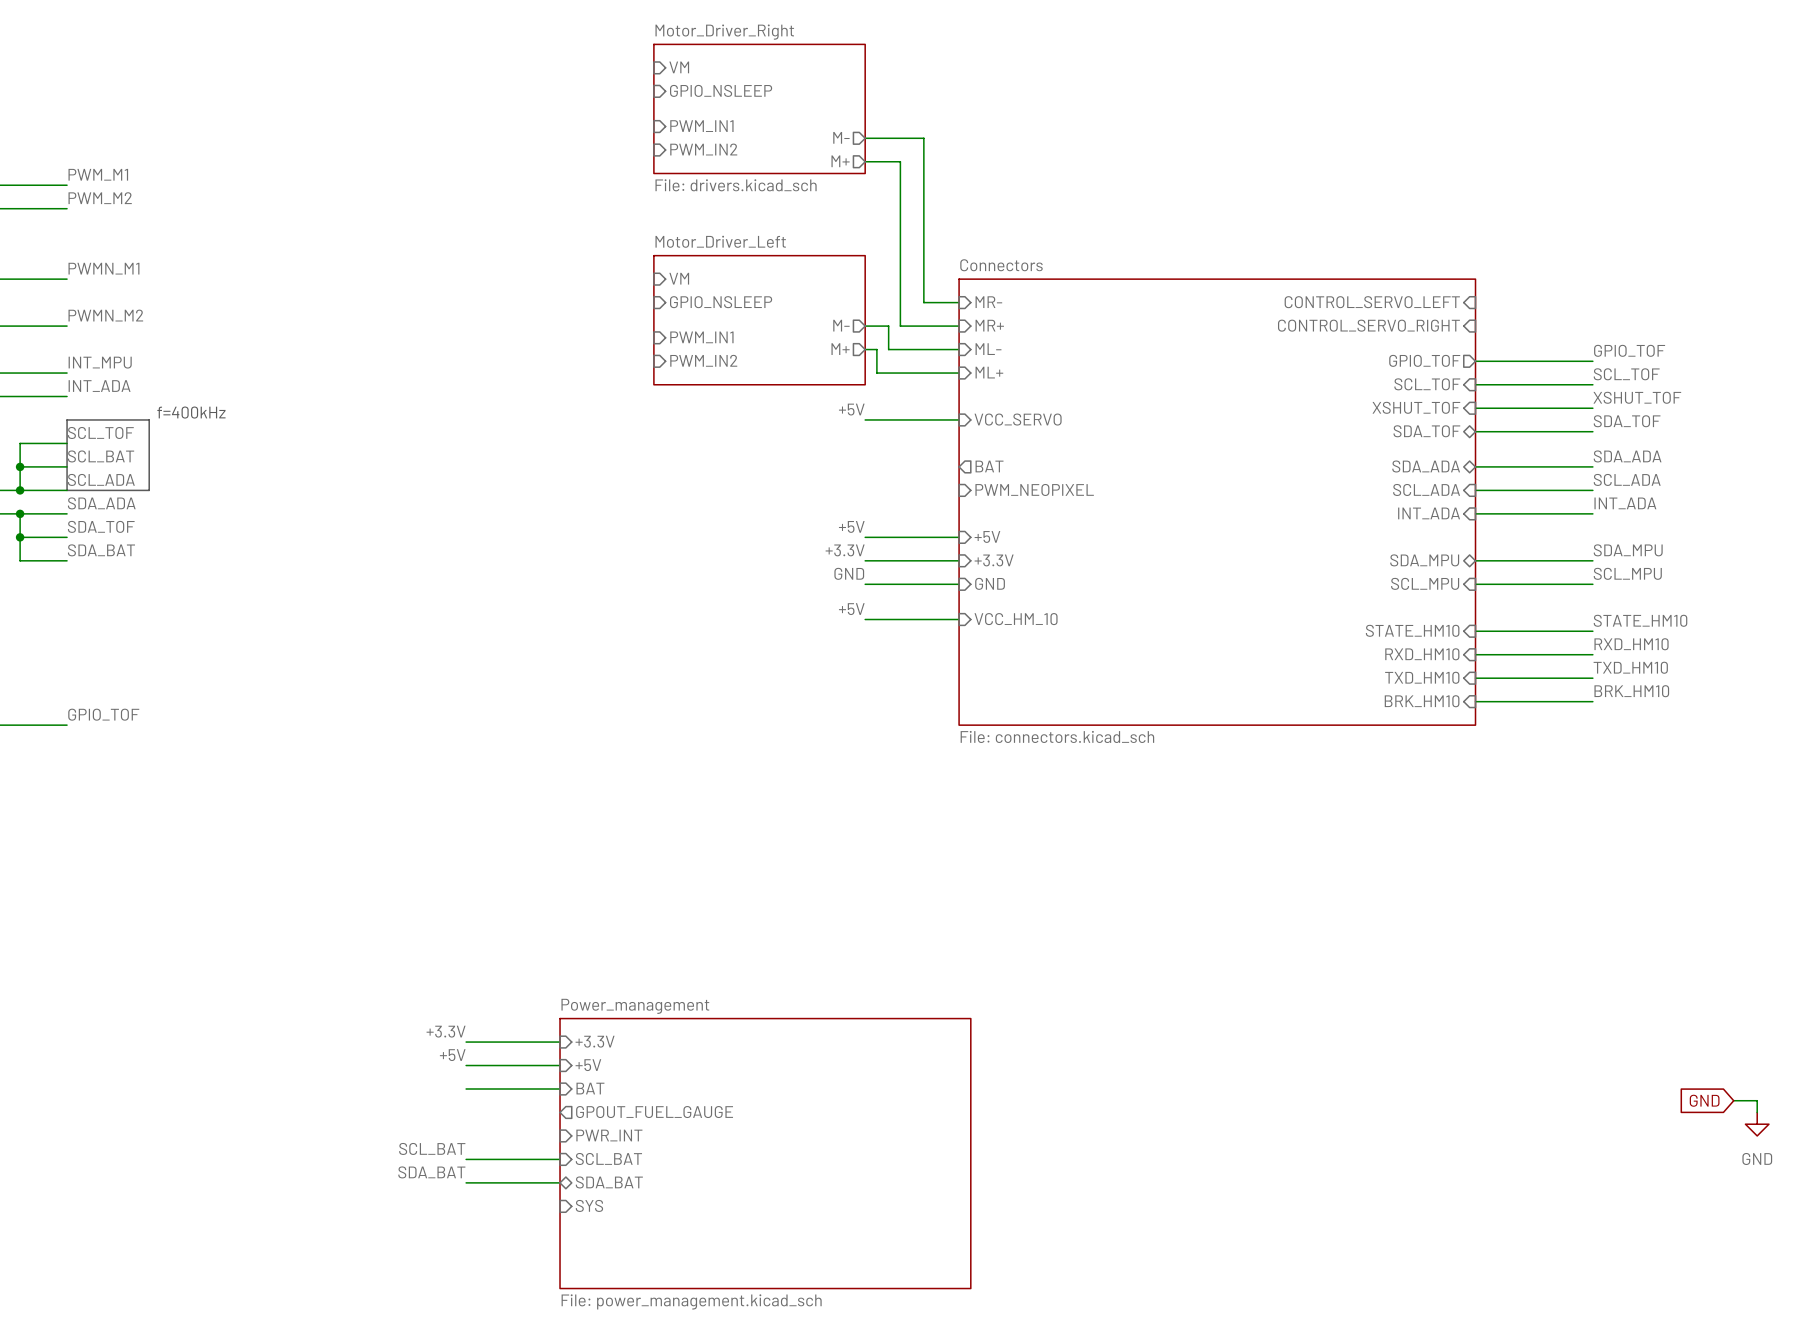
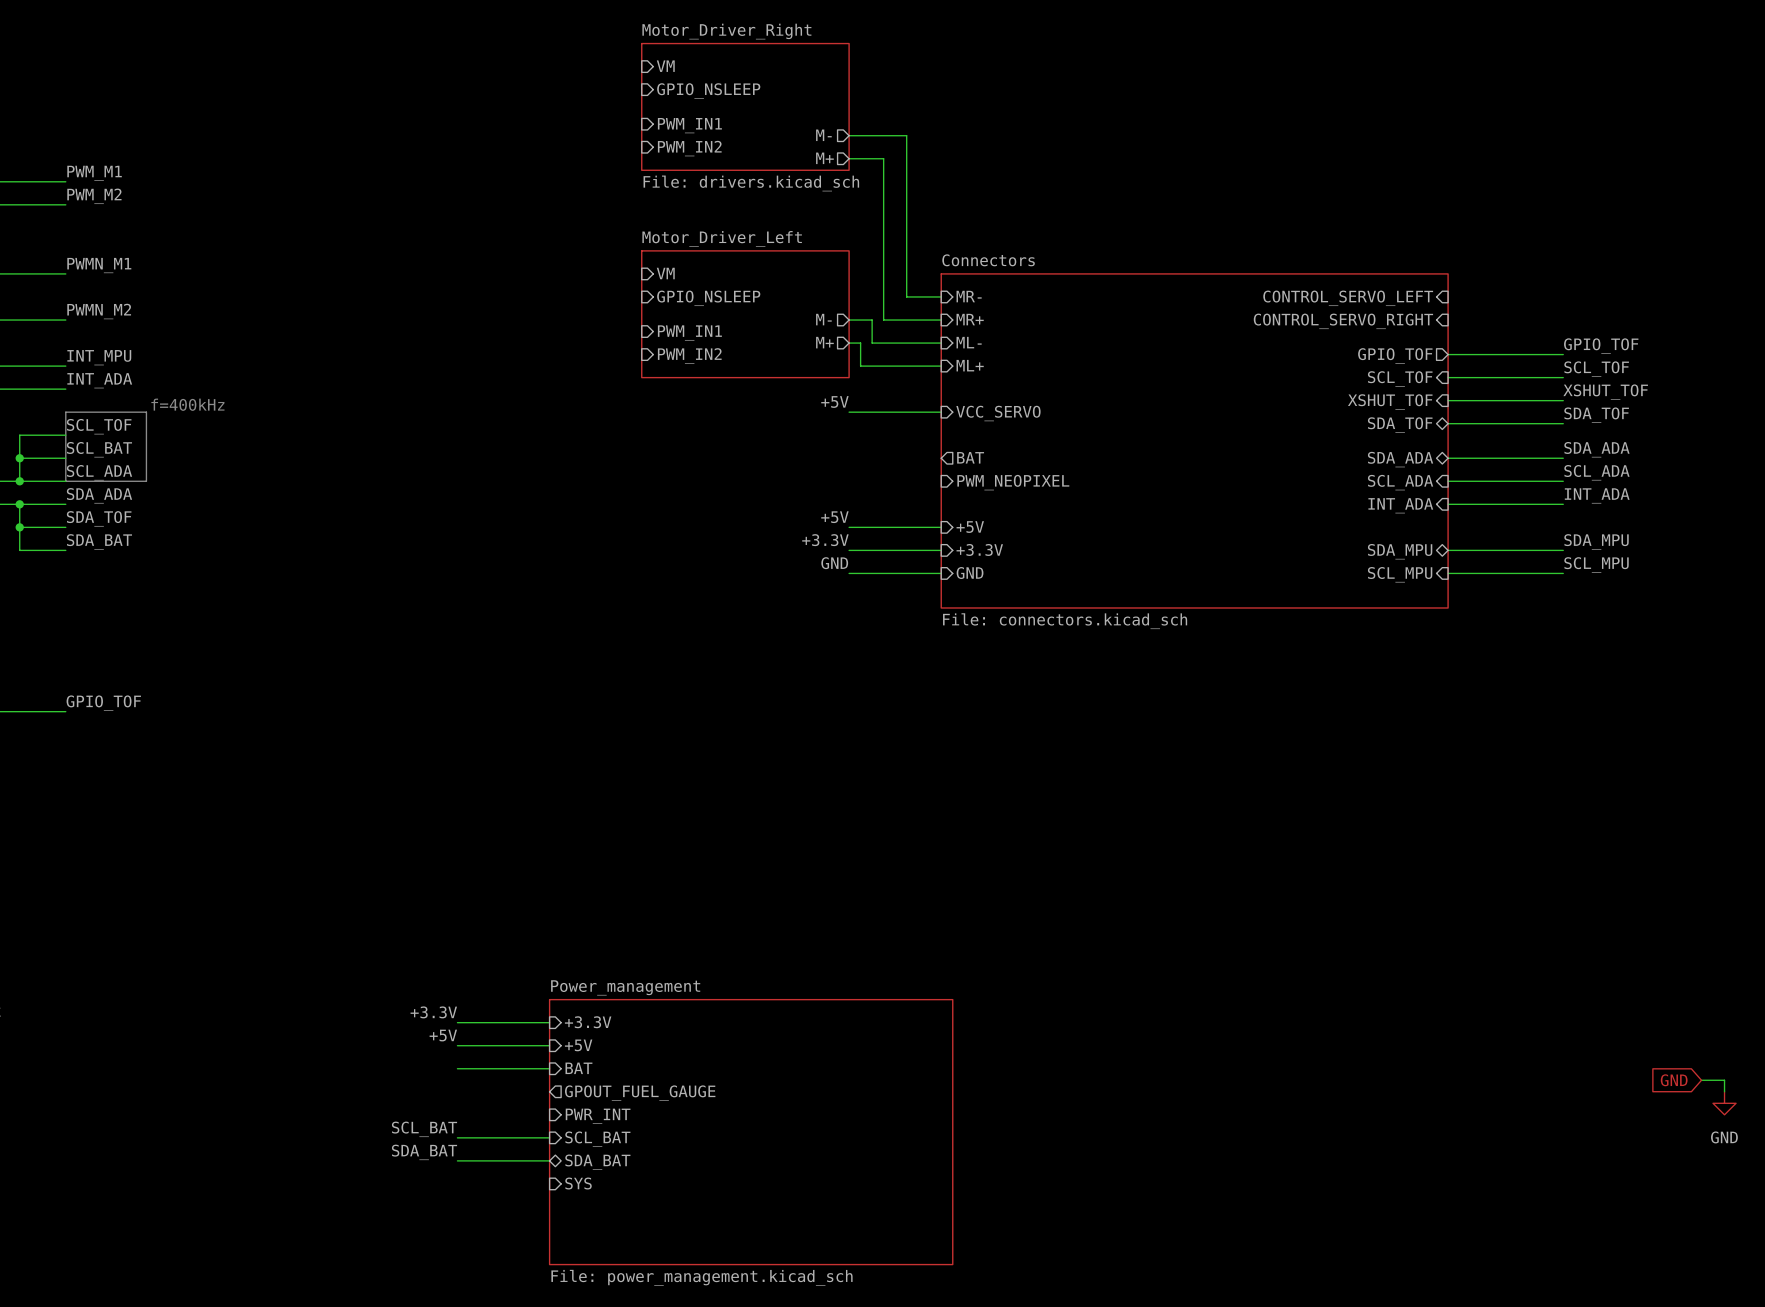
sheet Connectors: none -> File: connectors.kicad_sch (1194, 440)
sheet Connectors: File: connectors.kicad_sch (1217, 502) -> none
label: +5V (851, 609) -> none
wire: (865, 619) (959, 619) -> none
sheet pin: VCC_HM_10 (1016, 619) -> none
label: STATE_HM10 (1640, 620) -> none
sheet pin: STATE_HM10 (1412, 630) -> none
wire: (1475, 631) (1592, 631) -> none
label: RXD_HM10 (1631, 644) -> none
sheet pin: RXD_HM10 (1422, 654) -> none
wire: (1475, 654) (1592, 654) -> none
label: TXD_HM10 (1630, 667) -> none
sheet pin: TXD_HM10 (1422, 677) -> none
wire: (1475, 678) (1592, 678) -> none
label: BRK_HM10 (1631, 691) -> none
sheet pin: BRK_HM10 (1422, 701) -> none
wire: (1475, 701) (1592, 701) -> none

